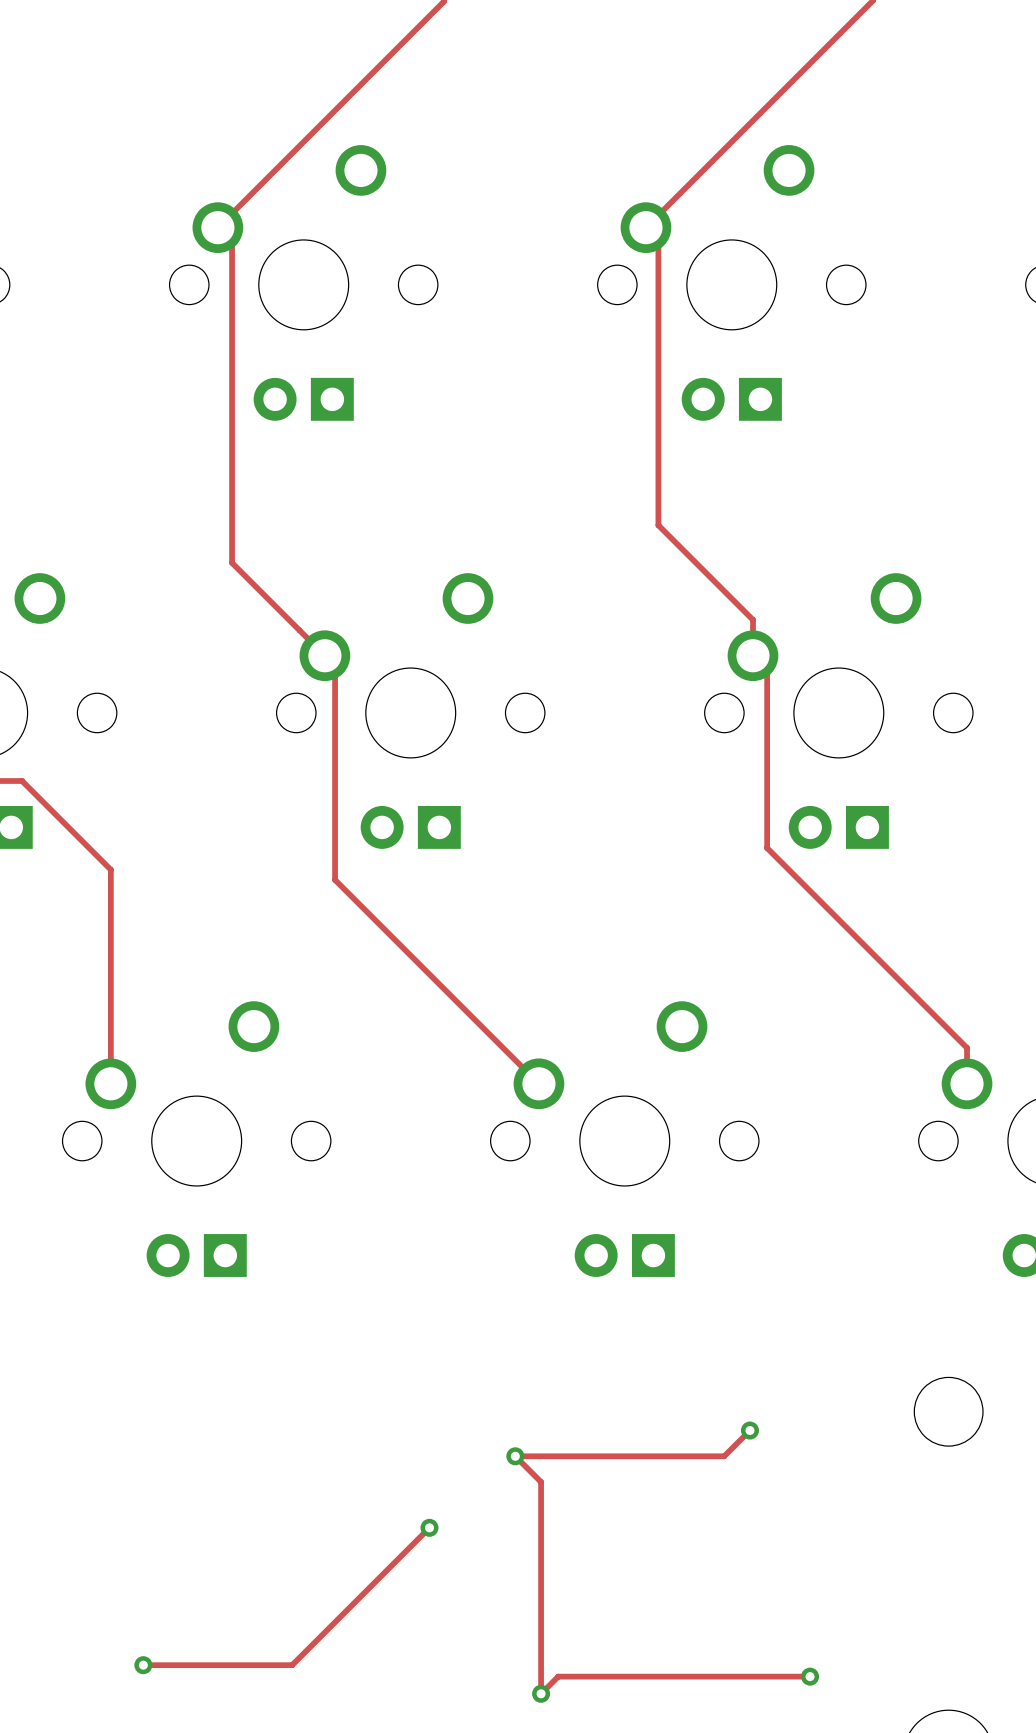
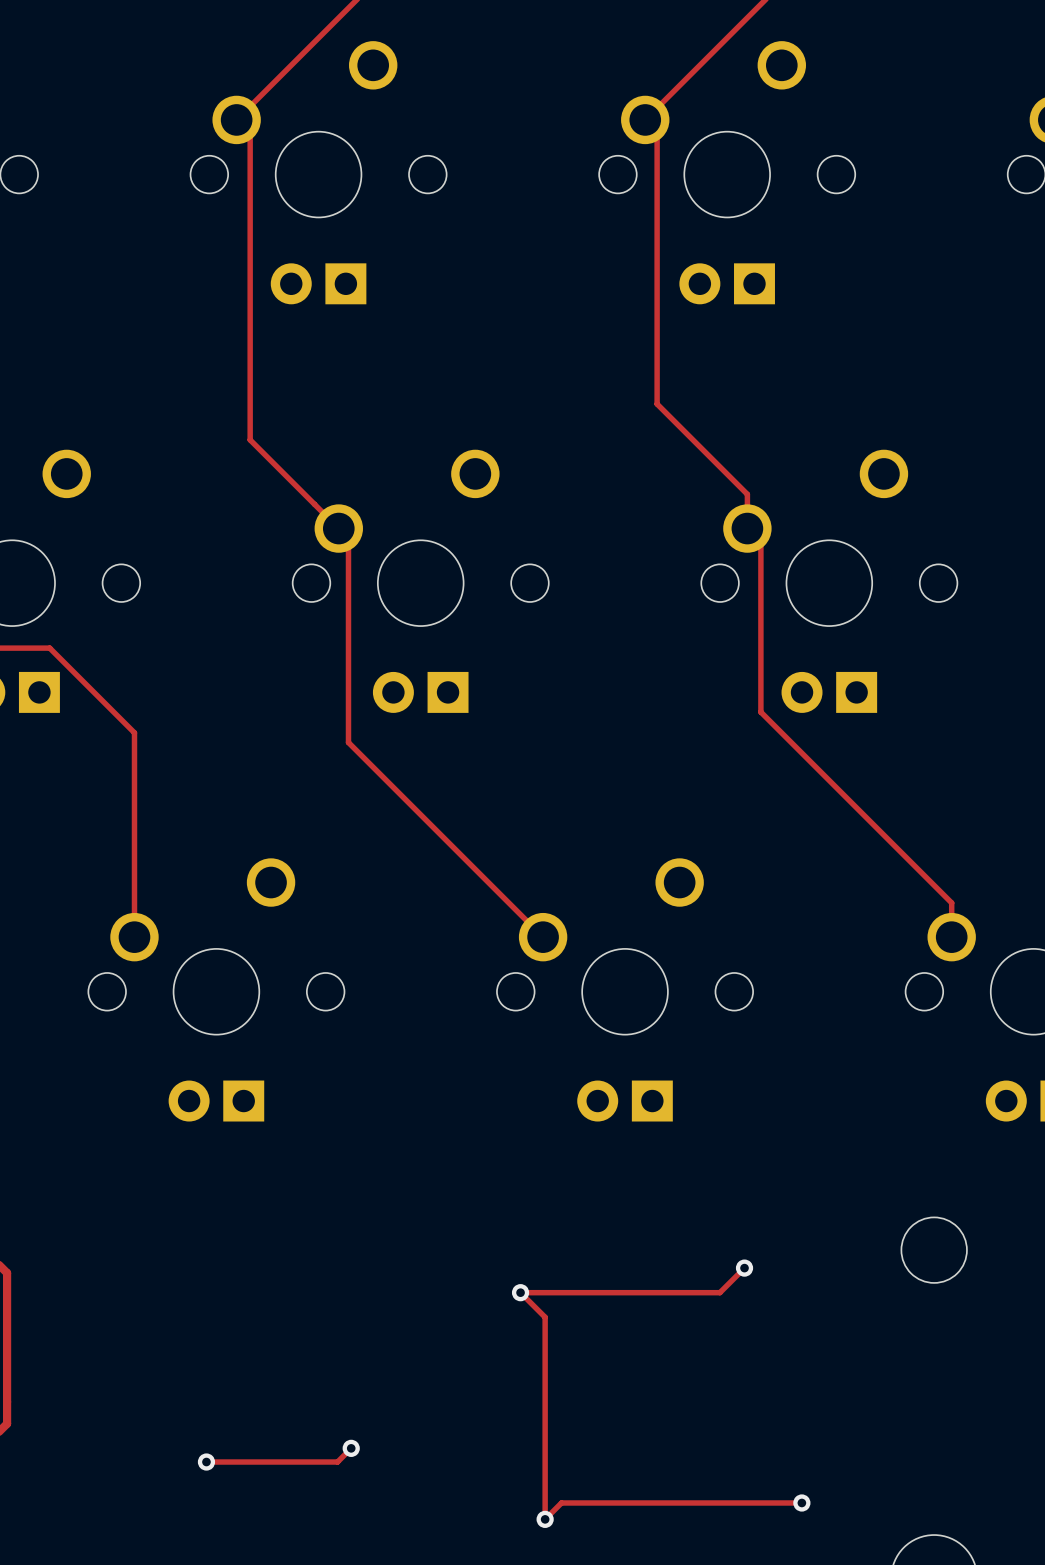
track: (429, 1527) (337, 1619) -> none
via: (429, 1527) -> none
via: none -> (351, 1448)
track: (323, 1633) (292, 1665) (143, 1665) -> (337, 1462) (206, 1462)
via position: (143, 1665) -> (206, 1462)

